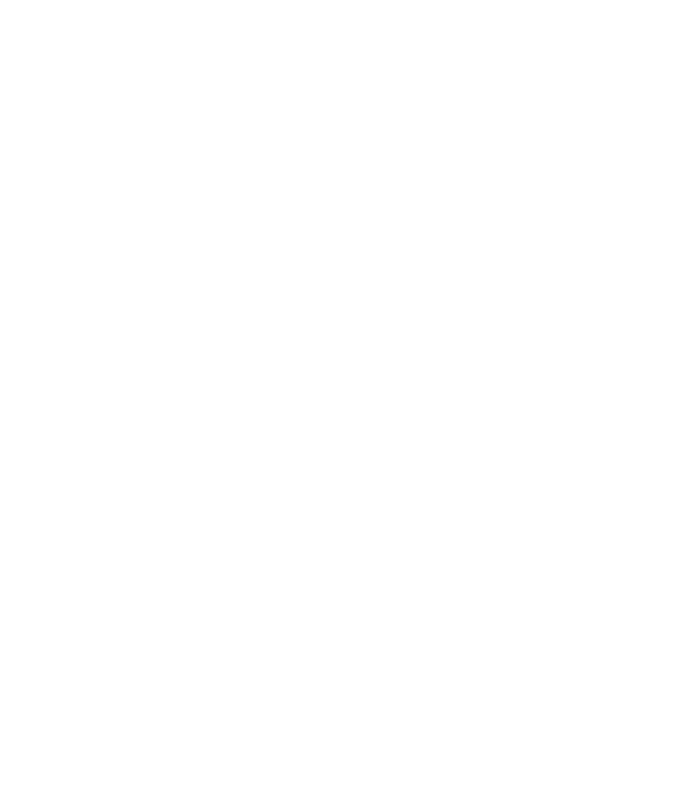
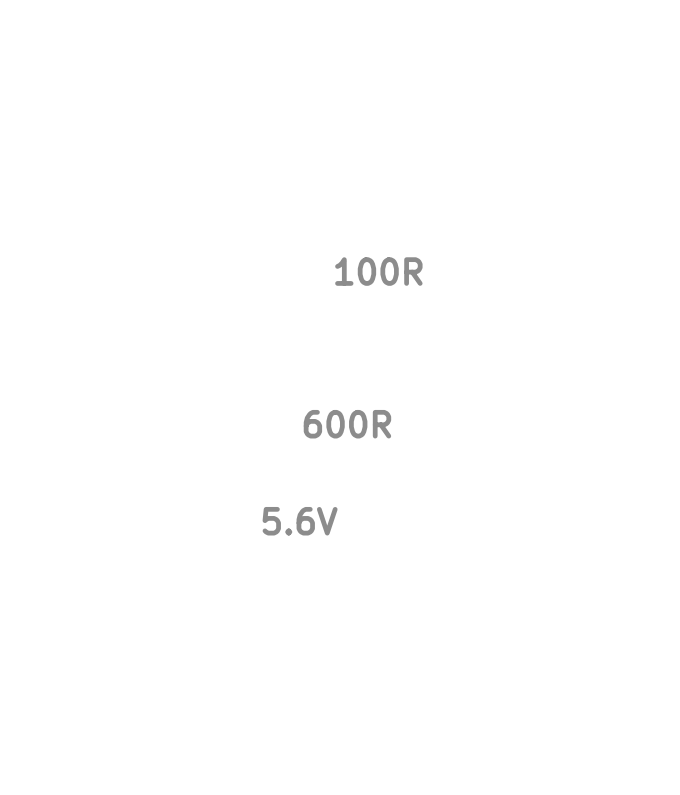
part: none -> 100R (378, 271)
part: none -> 600R (347, 424)
part: none -> 5.6V (300, 521)

